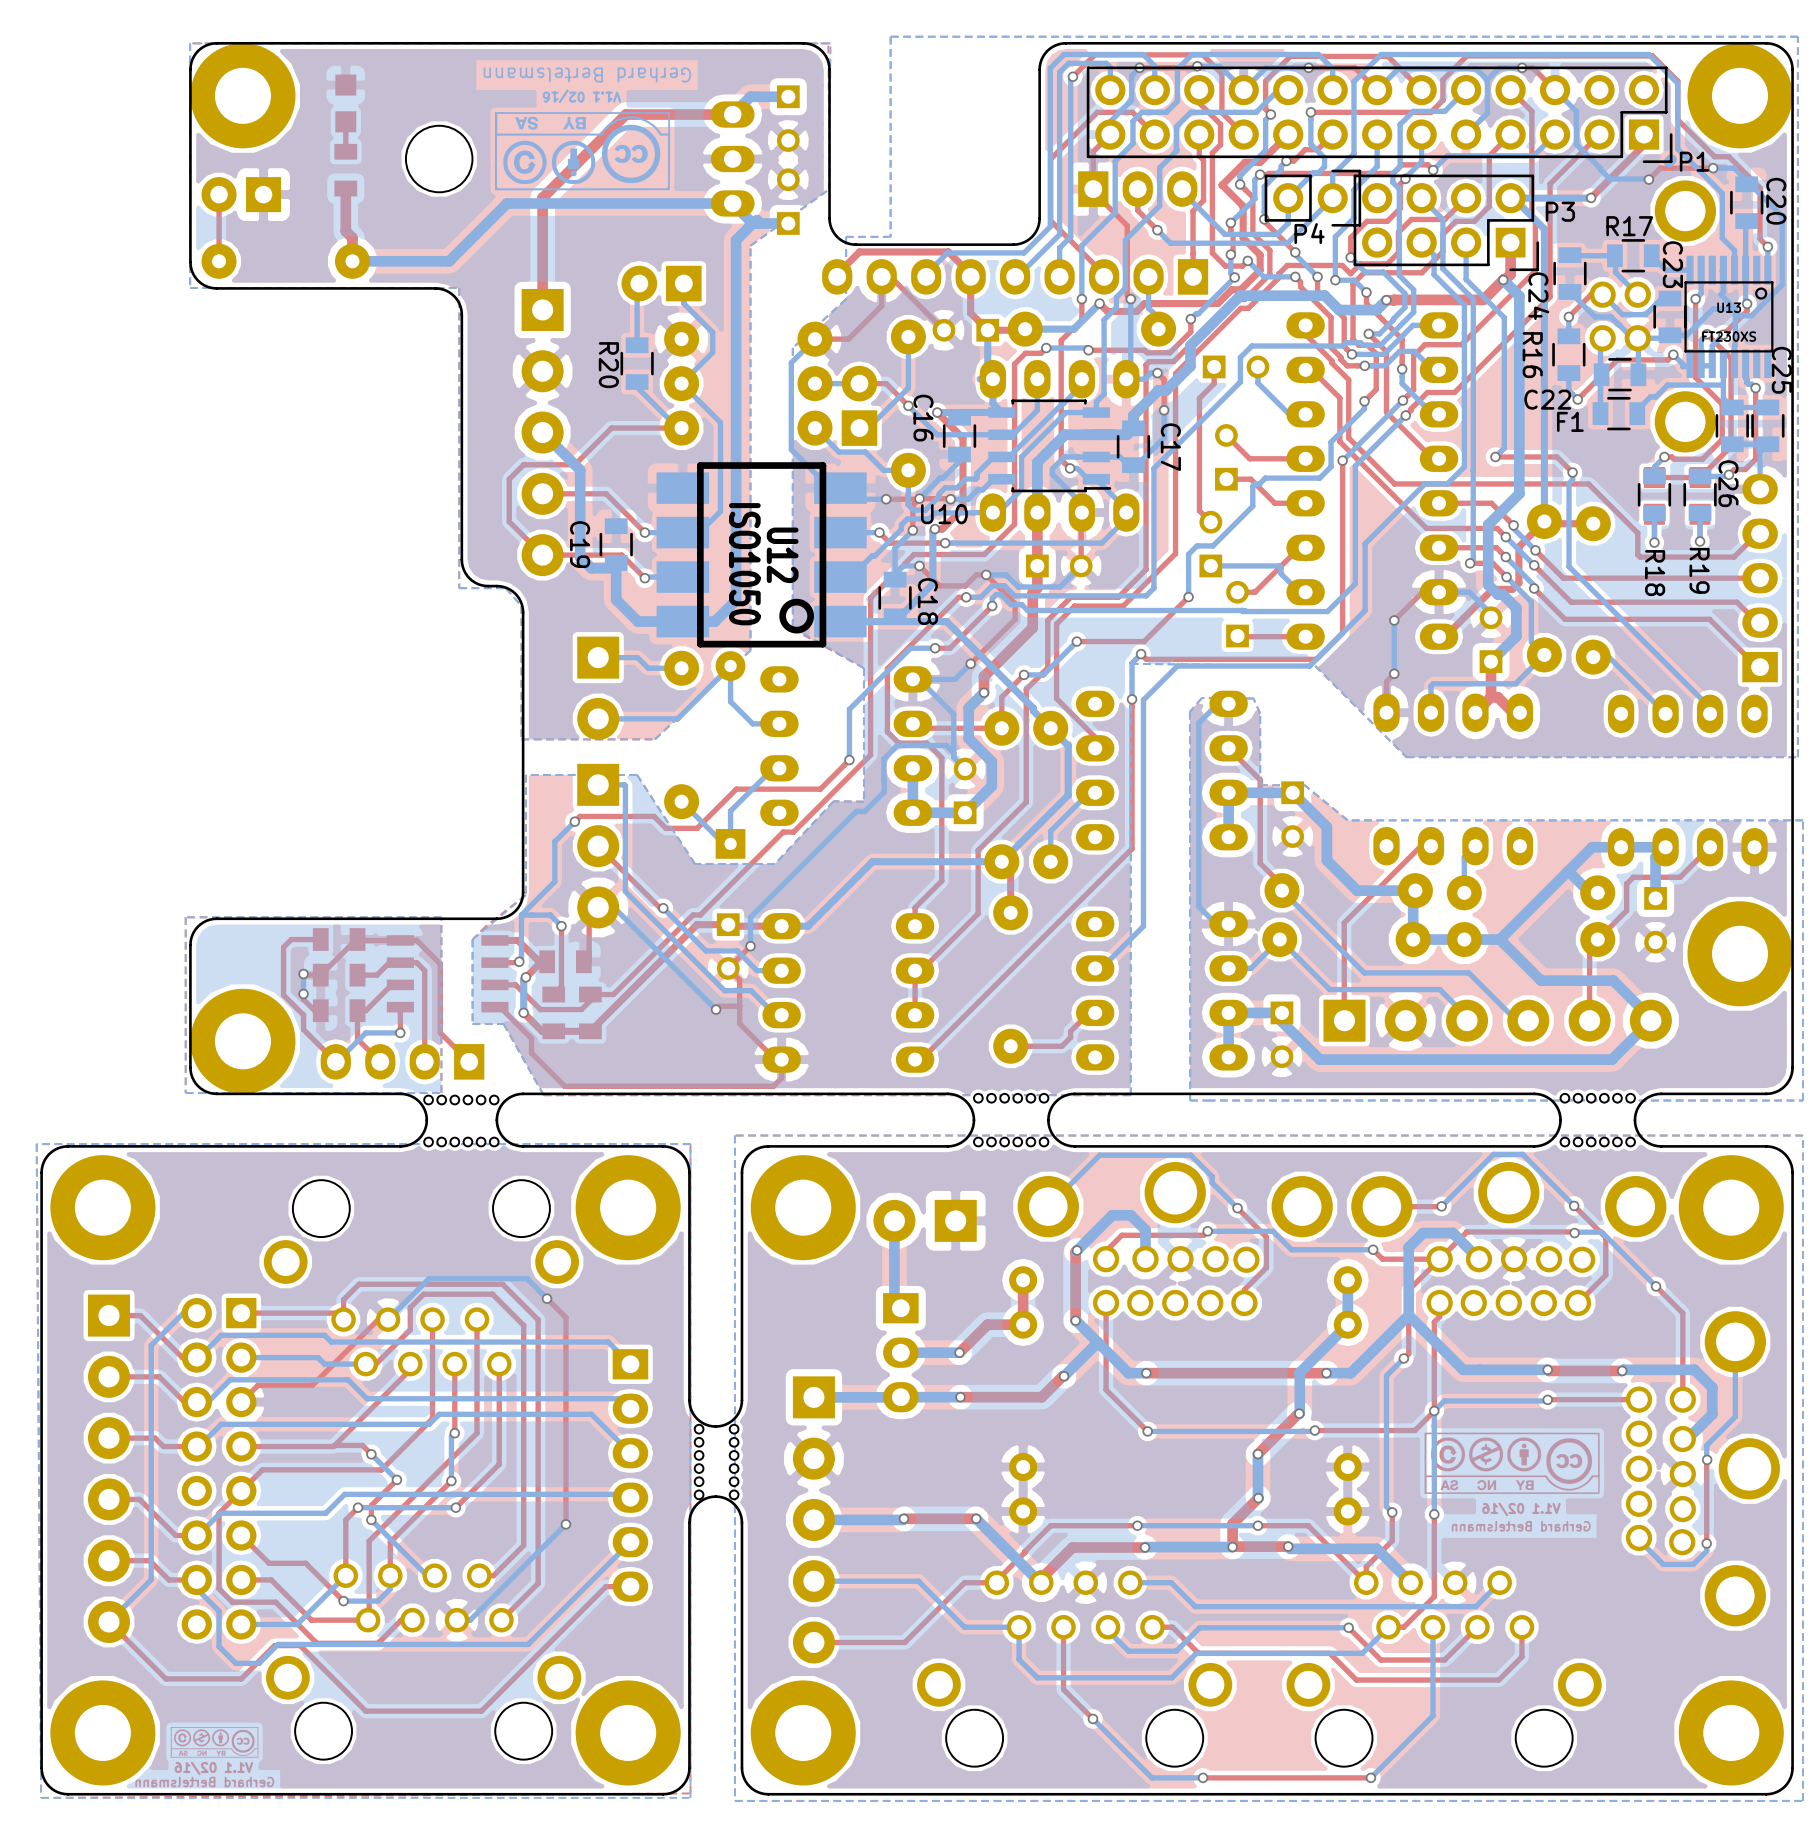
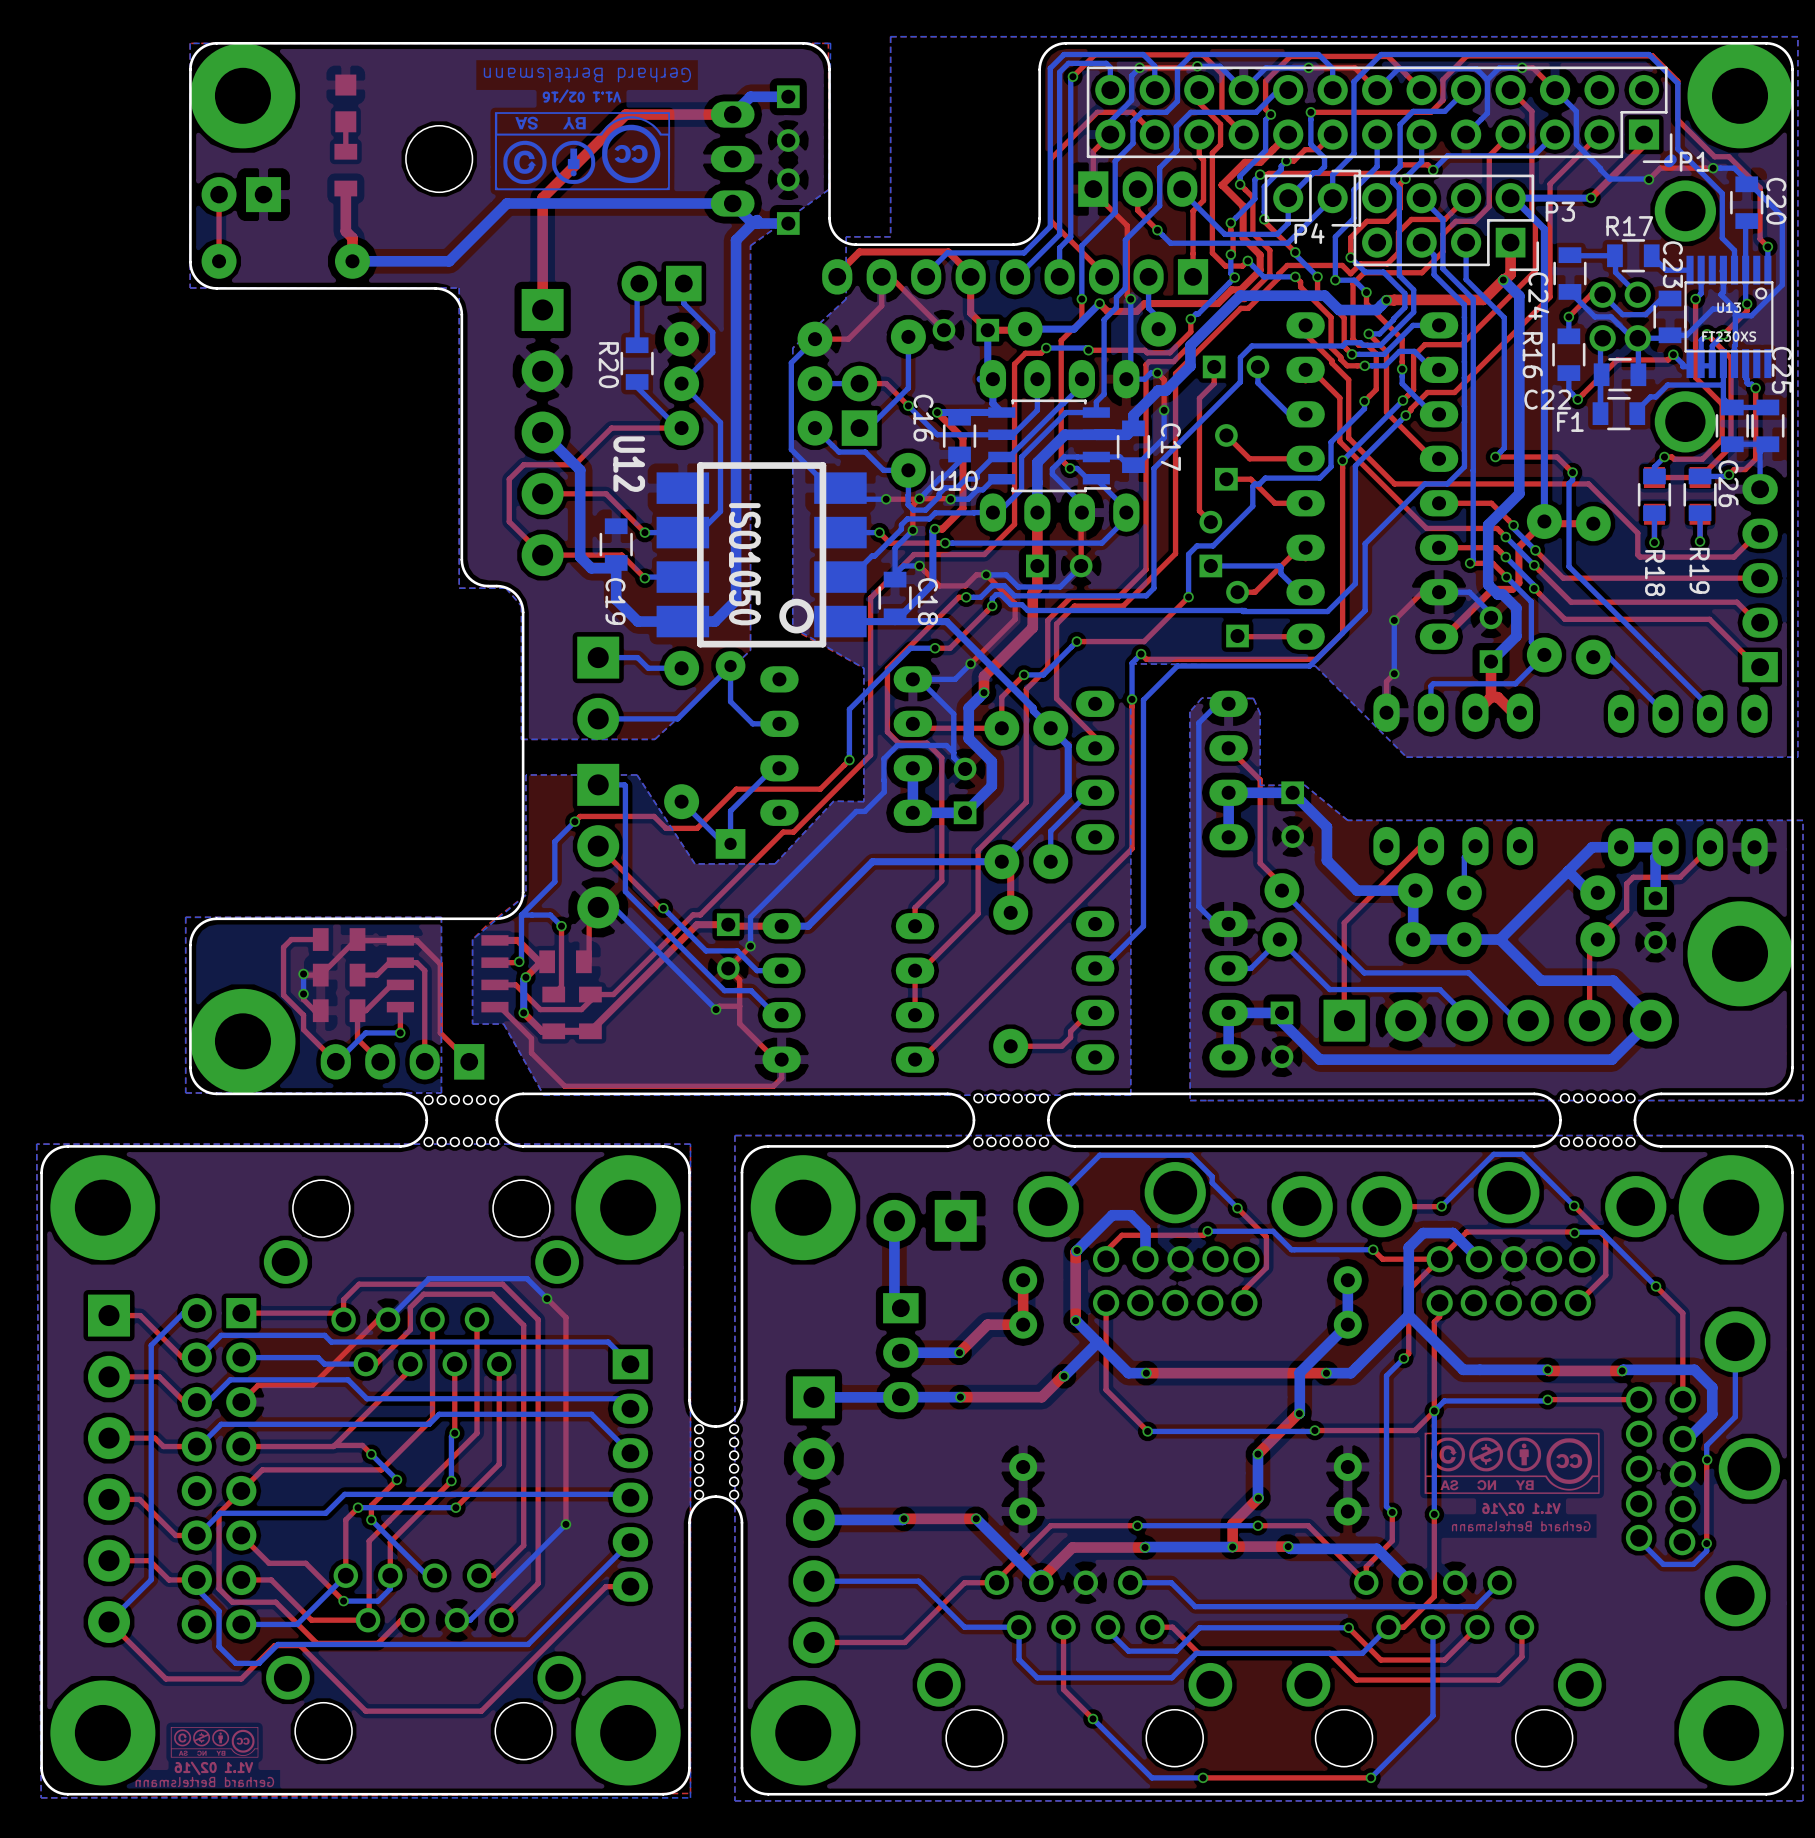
U10 name position: U10 (944, 514) -> U10 (954, 480)
C19 name position: C19 (580, 544) -> C19 (615, 601)
U12 name position: U12 (782, 555) -> U12 (629, 464)

